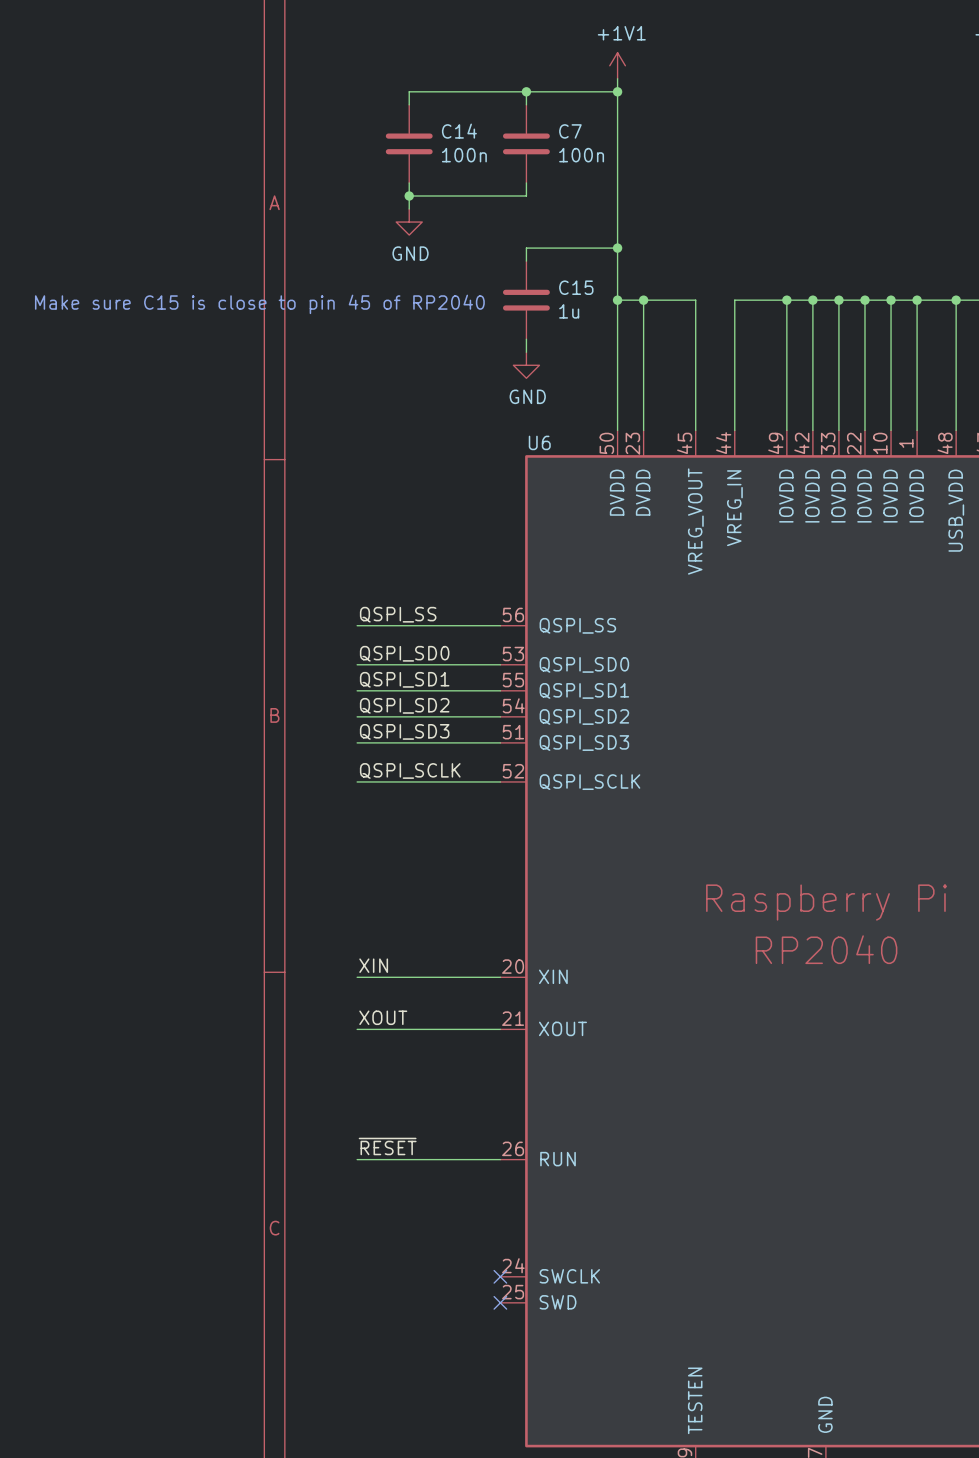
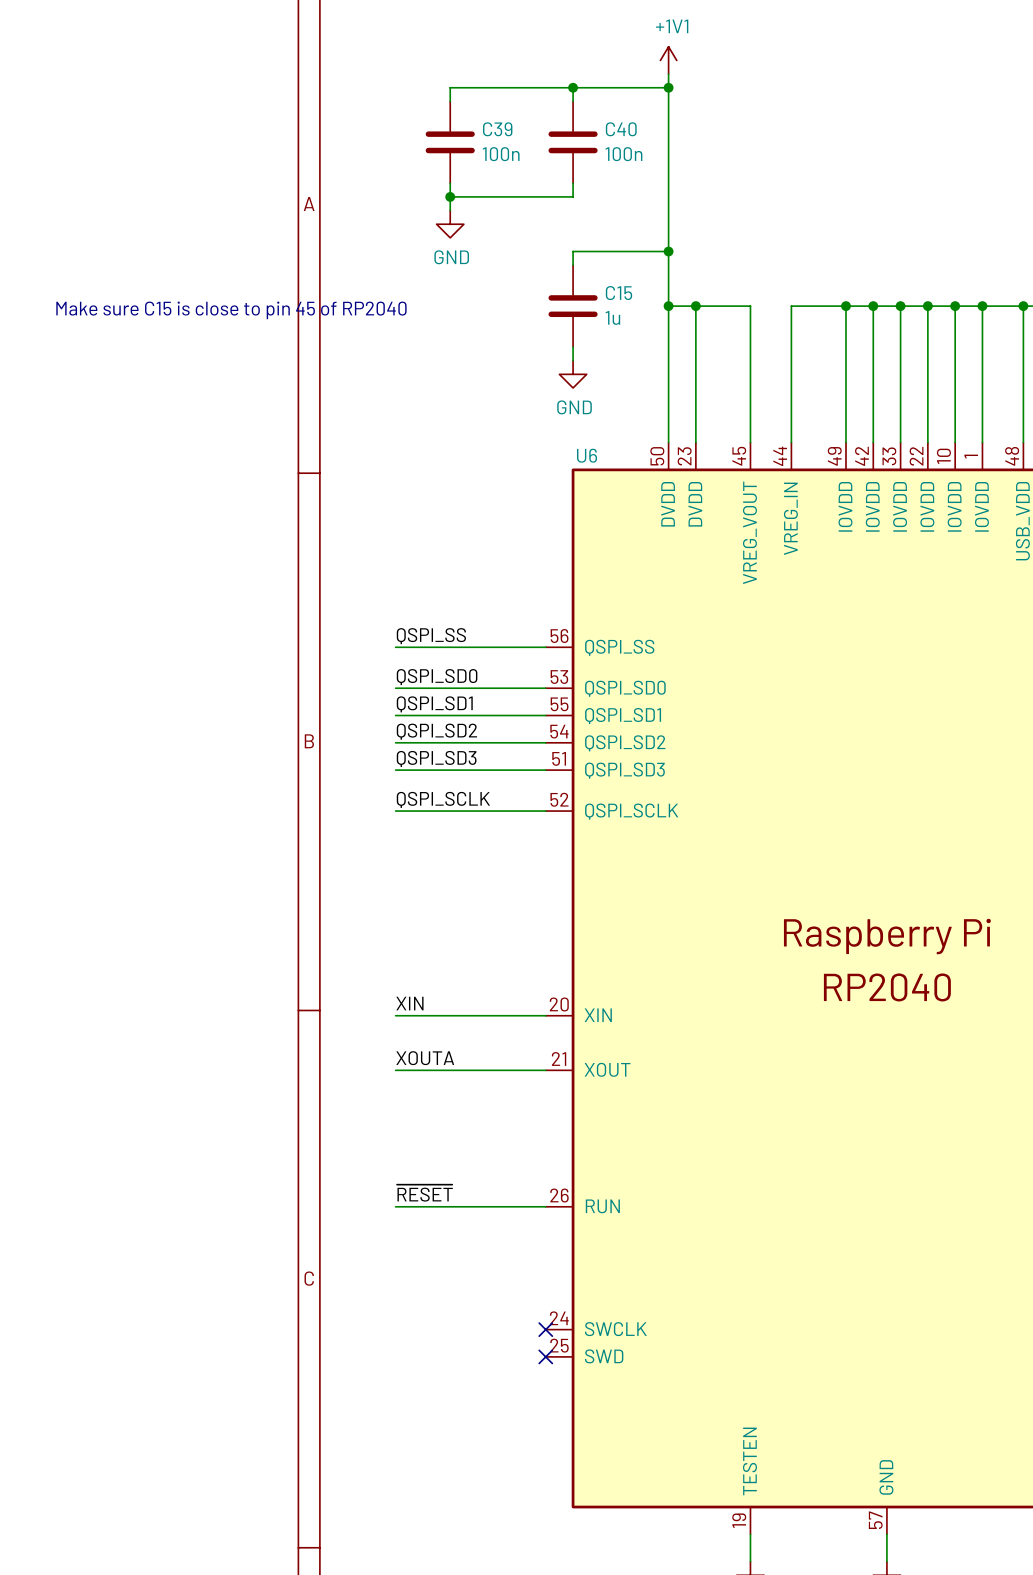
C14 name: C14 (459, 131) -> C39 (497, 129)
C7 name: C7 (570, 131) -> C40 (621, 129)
label: XOUT (383, 1017) -> XOUTA (425, 1058)

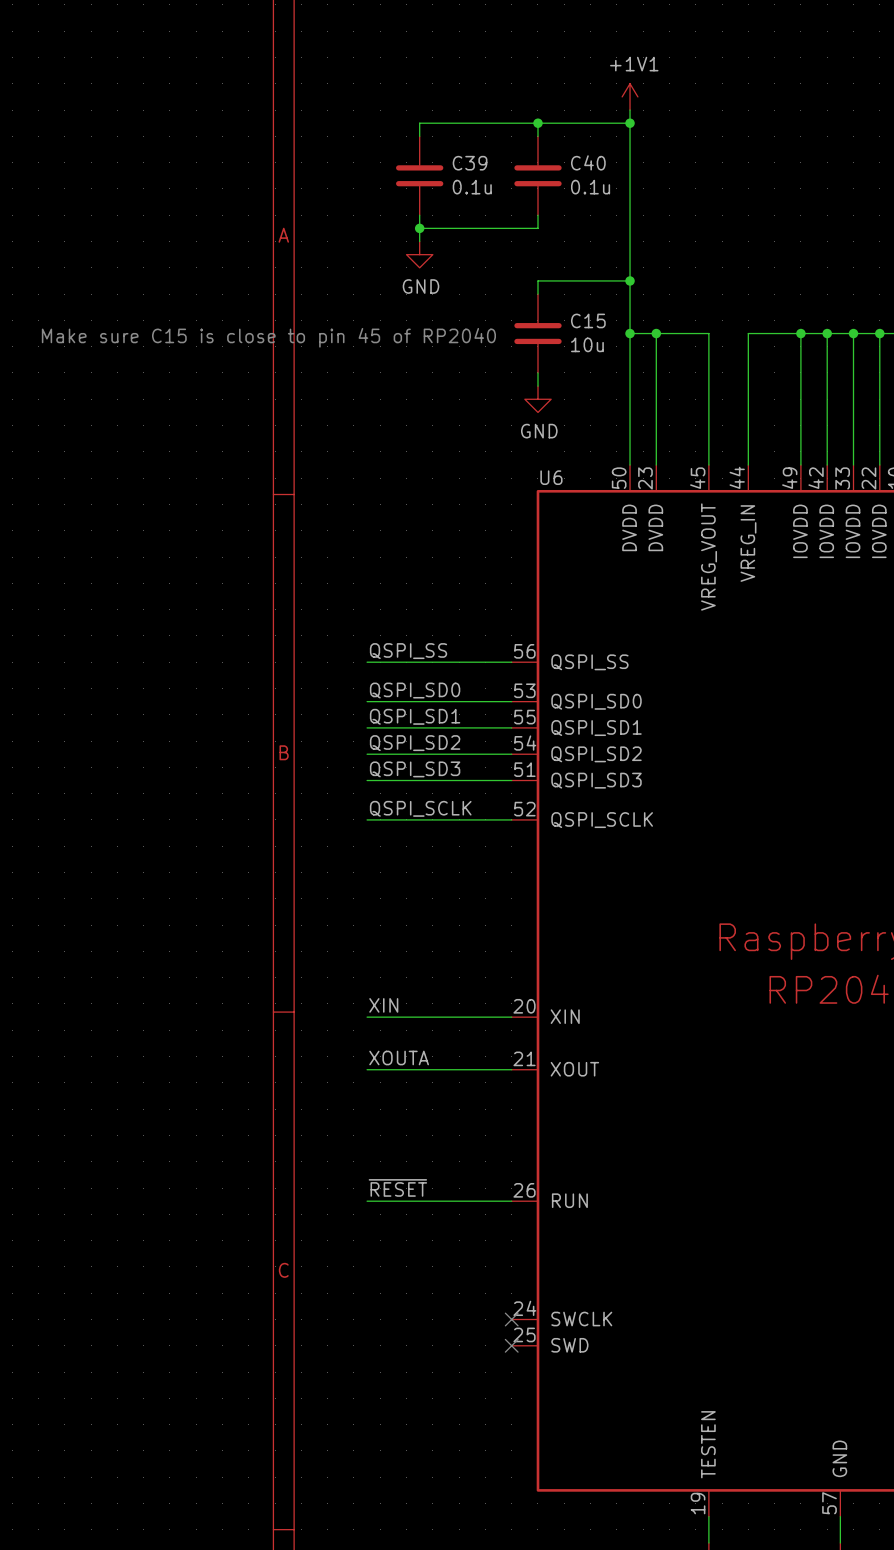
C39 value: 100n (501, 154) -> 0.1u (472, 187)
C40 value: 100n (623, 154) -> 0.1u (590, 187)
C15 value: 1u (612, 317) -> 10u (587, 344)

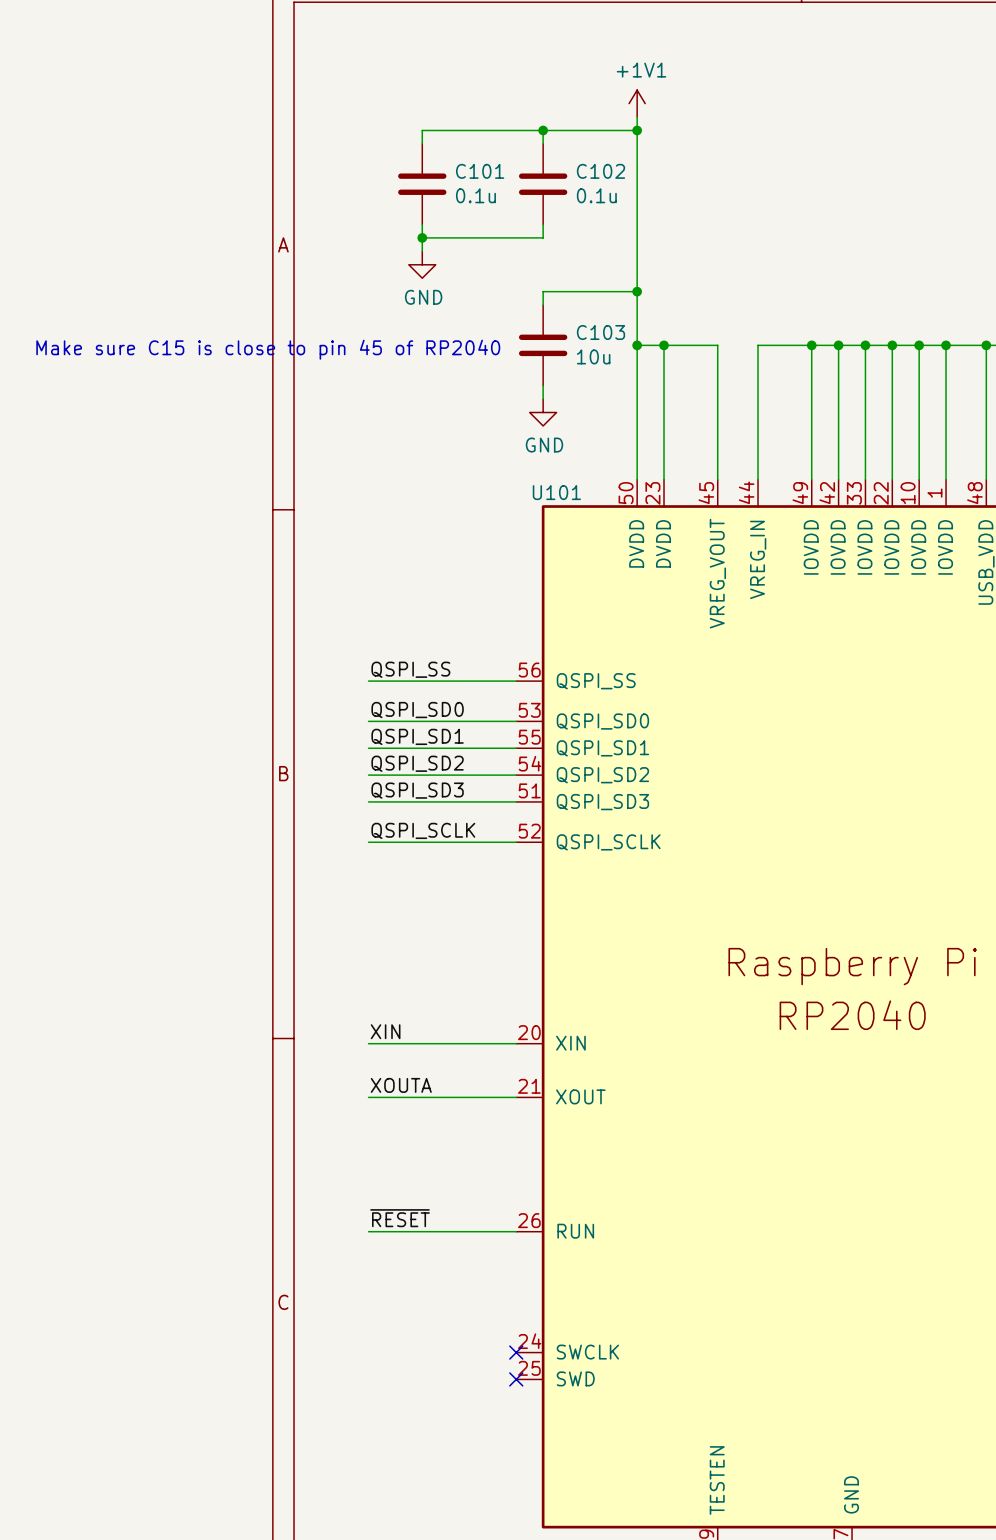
C40 name: C40 (588, 162) -> C102 (600, 171)
C39 name: C39 (470, 163) -> C101 (480, 171)
C15 name: C15 (588, 320) -> C103 (600, 332)
U6 name: U6 (551, 477) -> U101 (556, 492)

